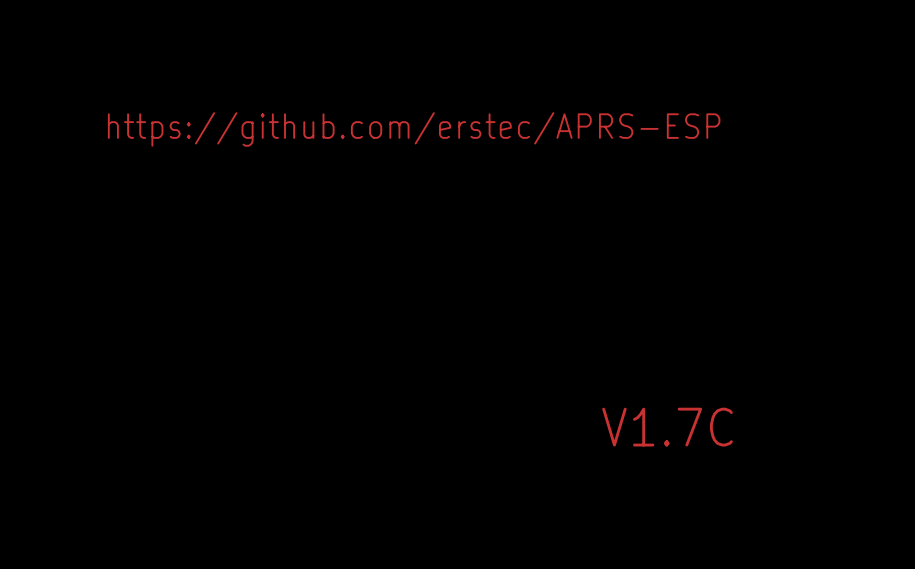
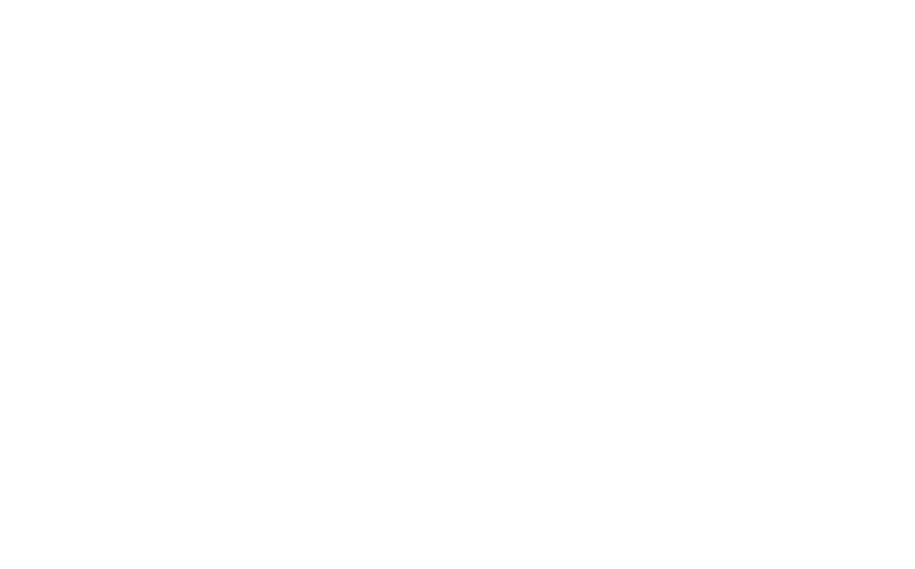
text: https://github.com/erstec/APRS-ESP (414, 129) -> none
text: V1.7C (667, 427) -> none

